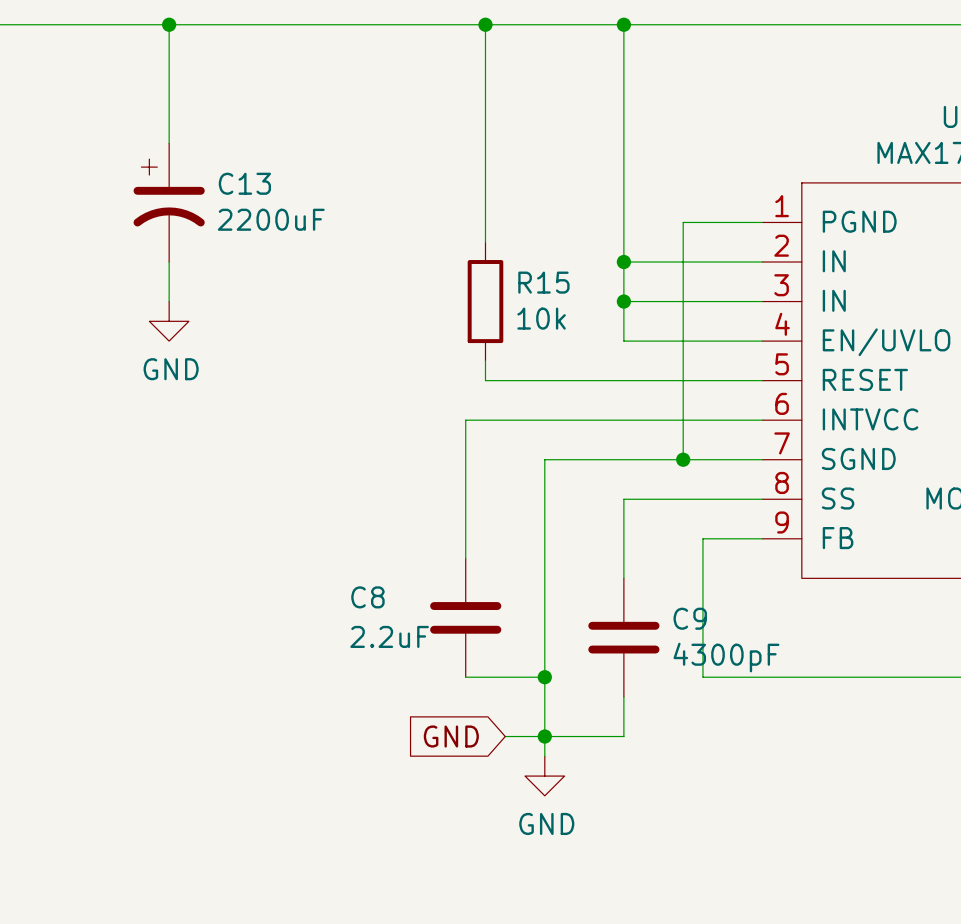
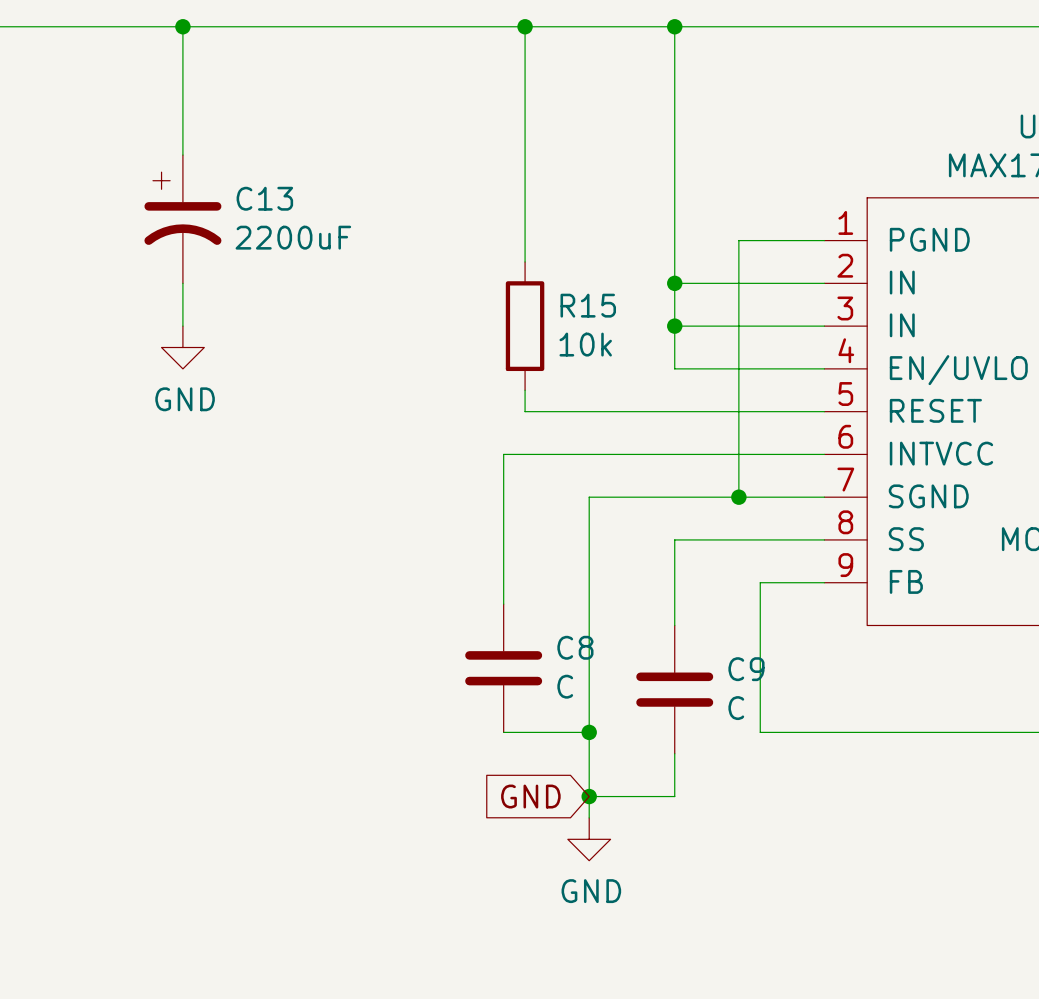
C8 name position: C8 (367, 597) -> C8 (575, 647)
C8 value: 2.2uF (389, 636) -> C (565, 686)
C9 value: 4300pF (726, 657) -> C (736, 708)
global label position: GND (451, 736) -> GND (530, 796)
wire: (505, 736) (544, 736) -> none

